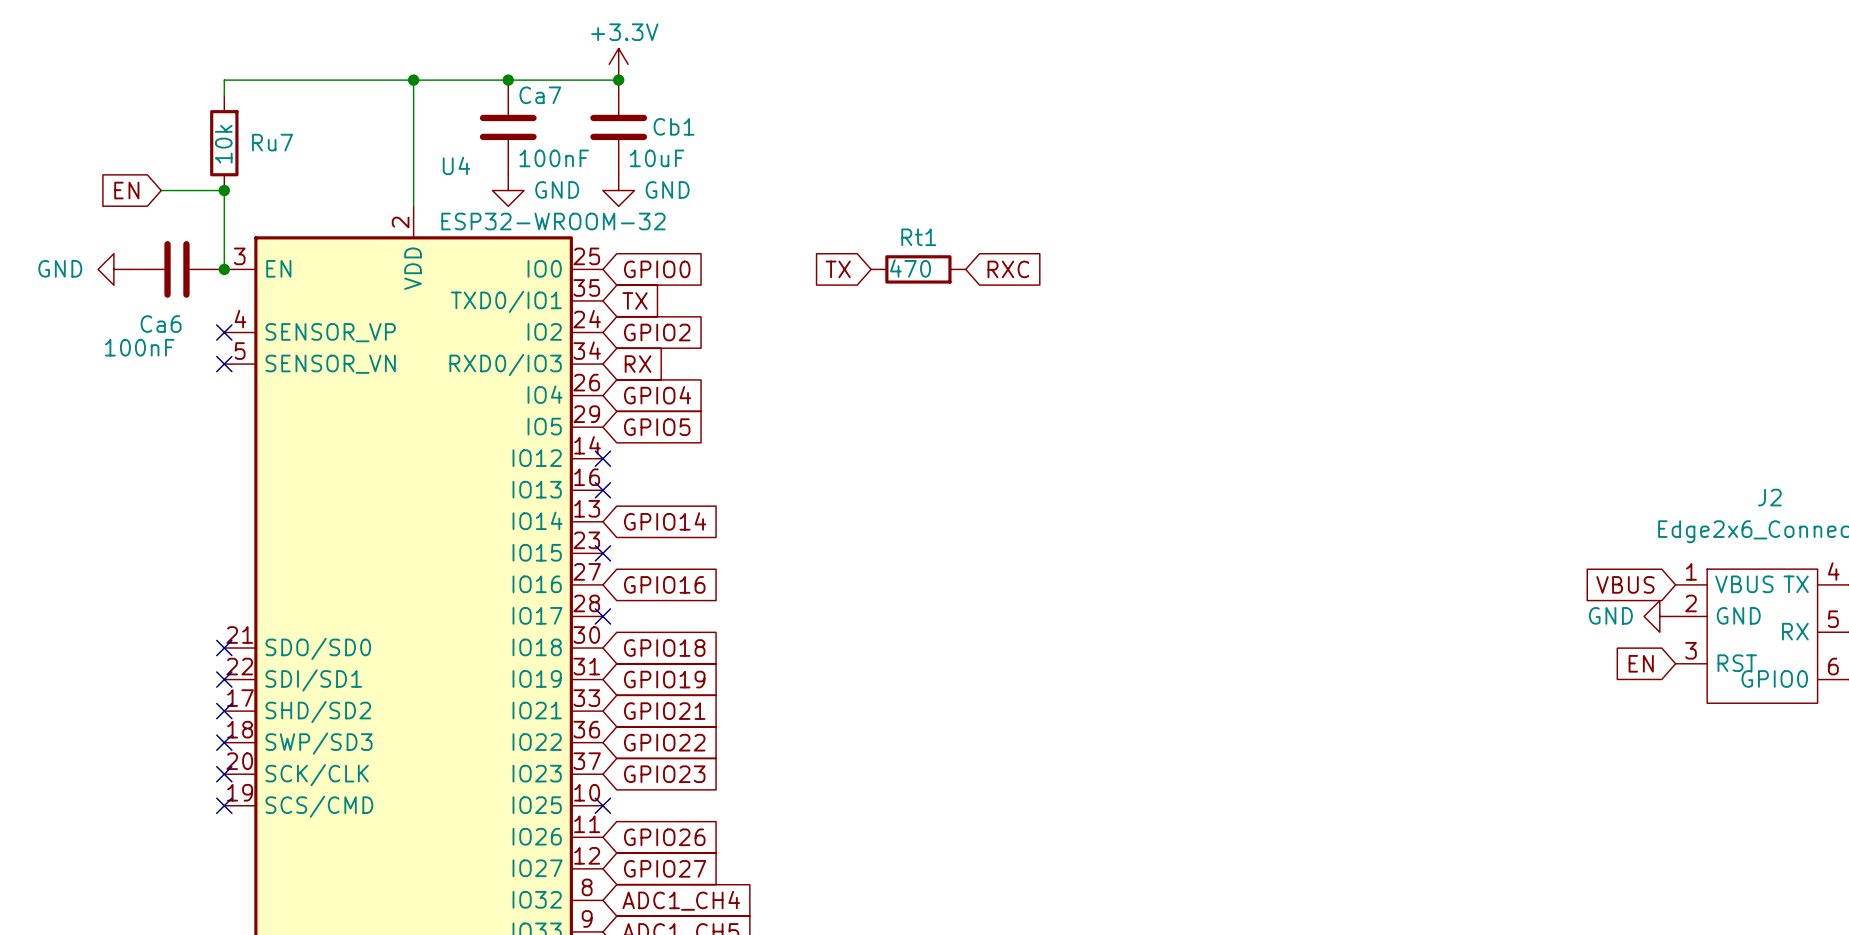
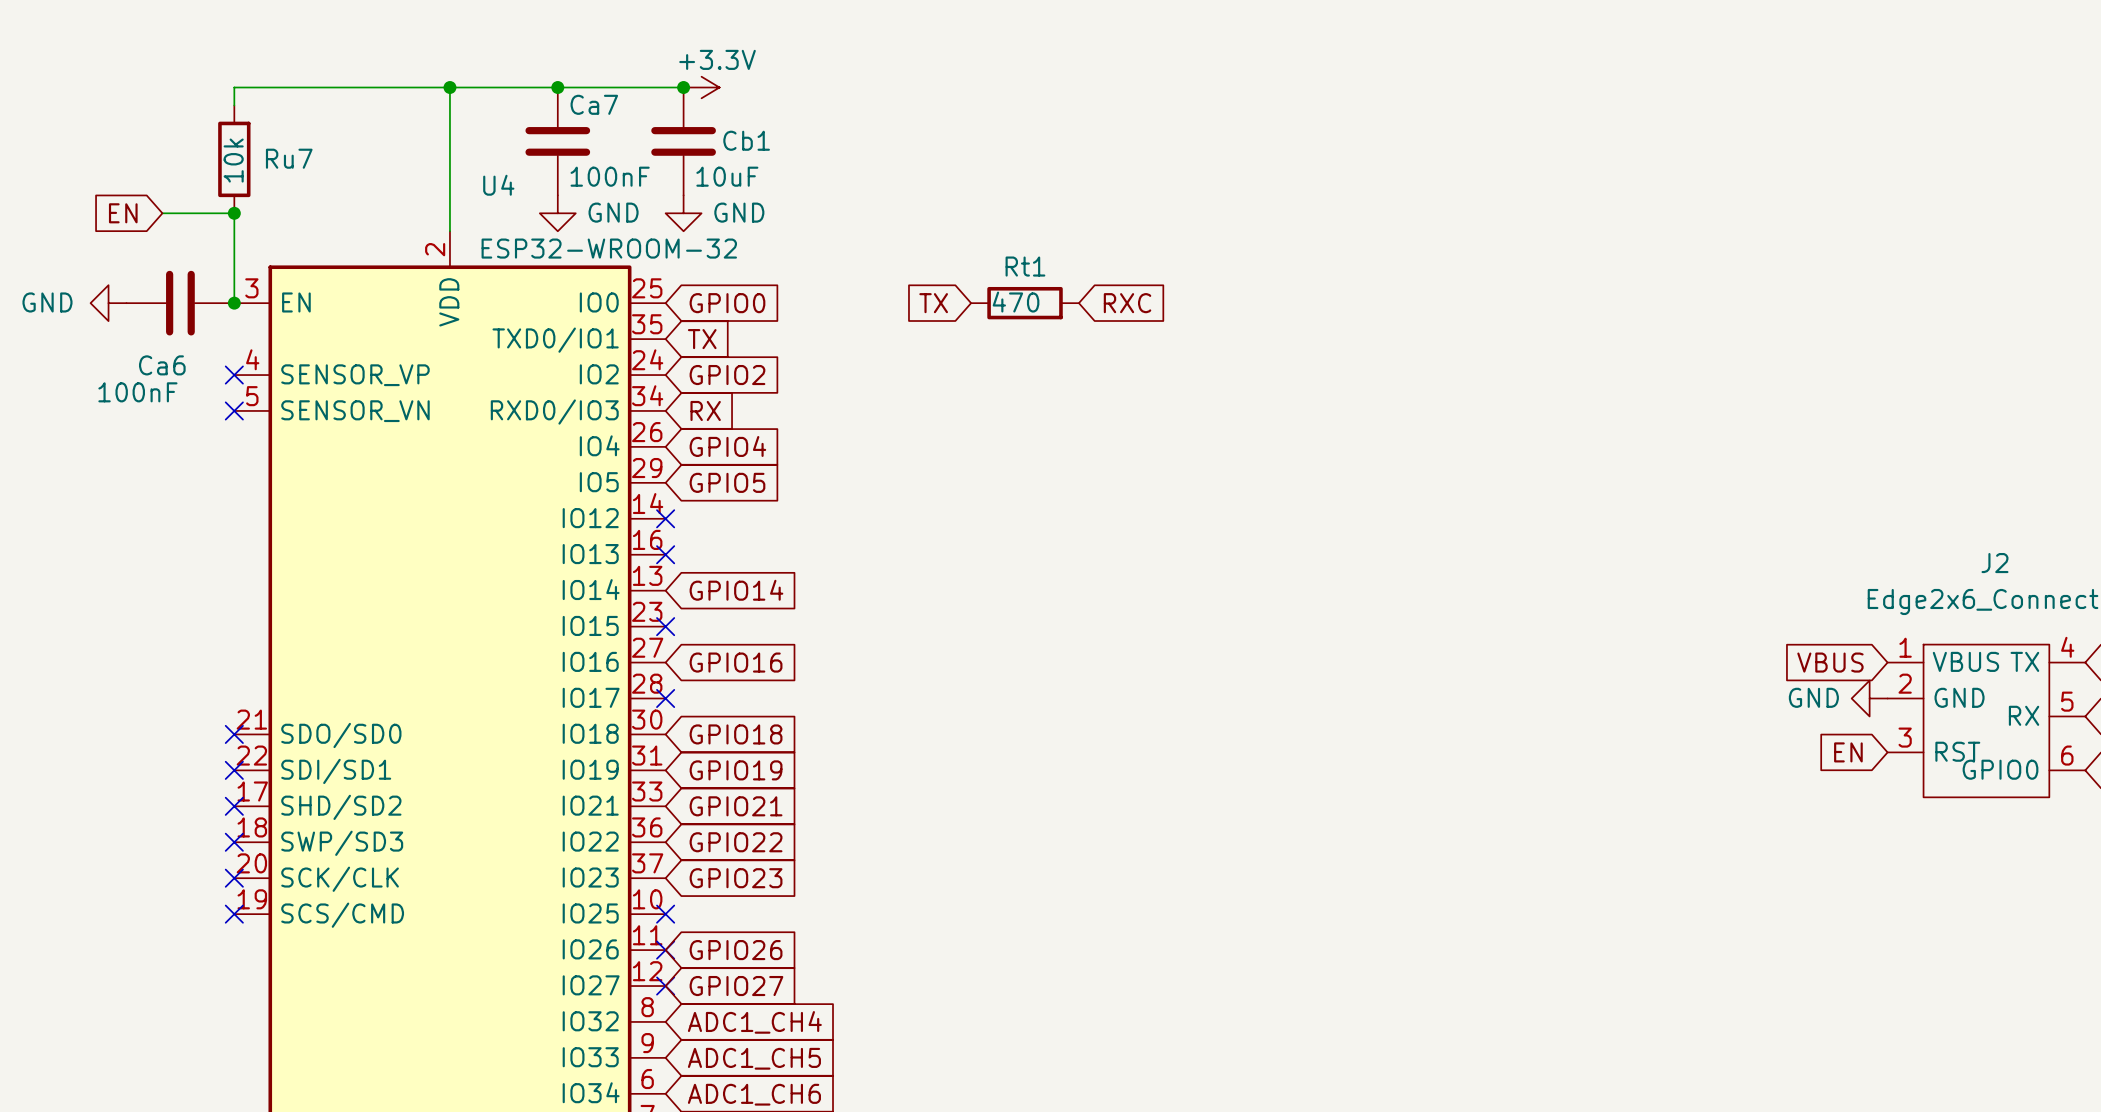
power symbol rotation: 0° (618, 64) -> 90° clockwise (701, 87)
power symbol position: +3.3V (618, 64) -> +3.3V (701, 87)
no-connect mark: none -> (665, 950)
no-connect mark: none -> (665, 986)

